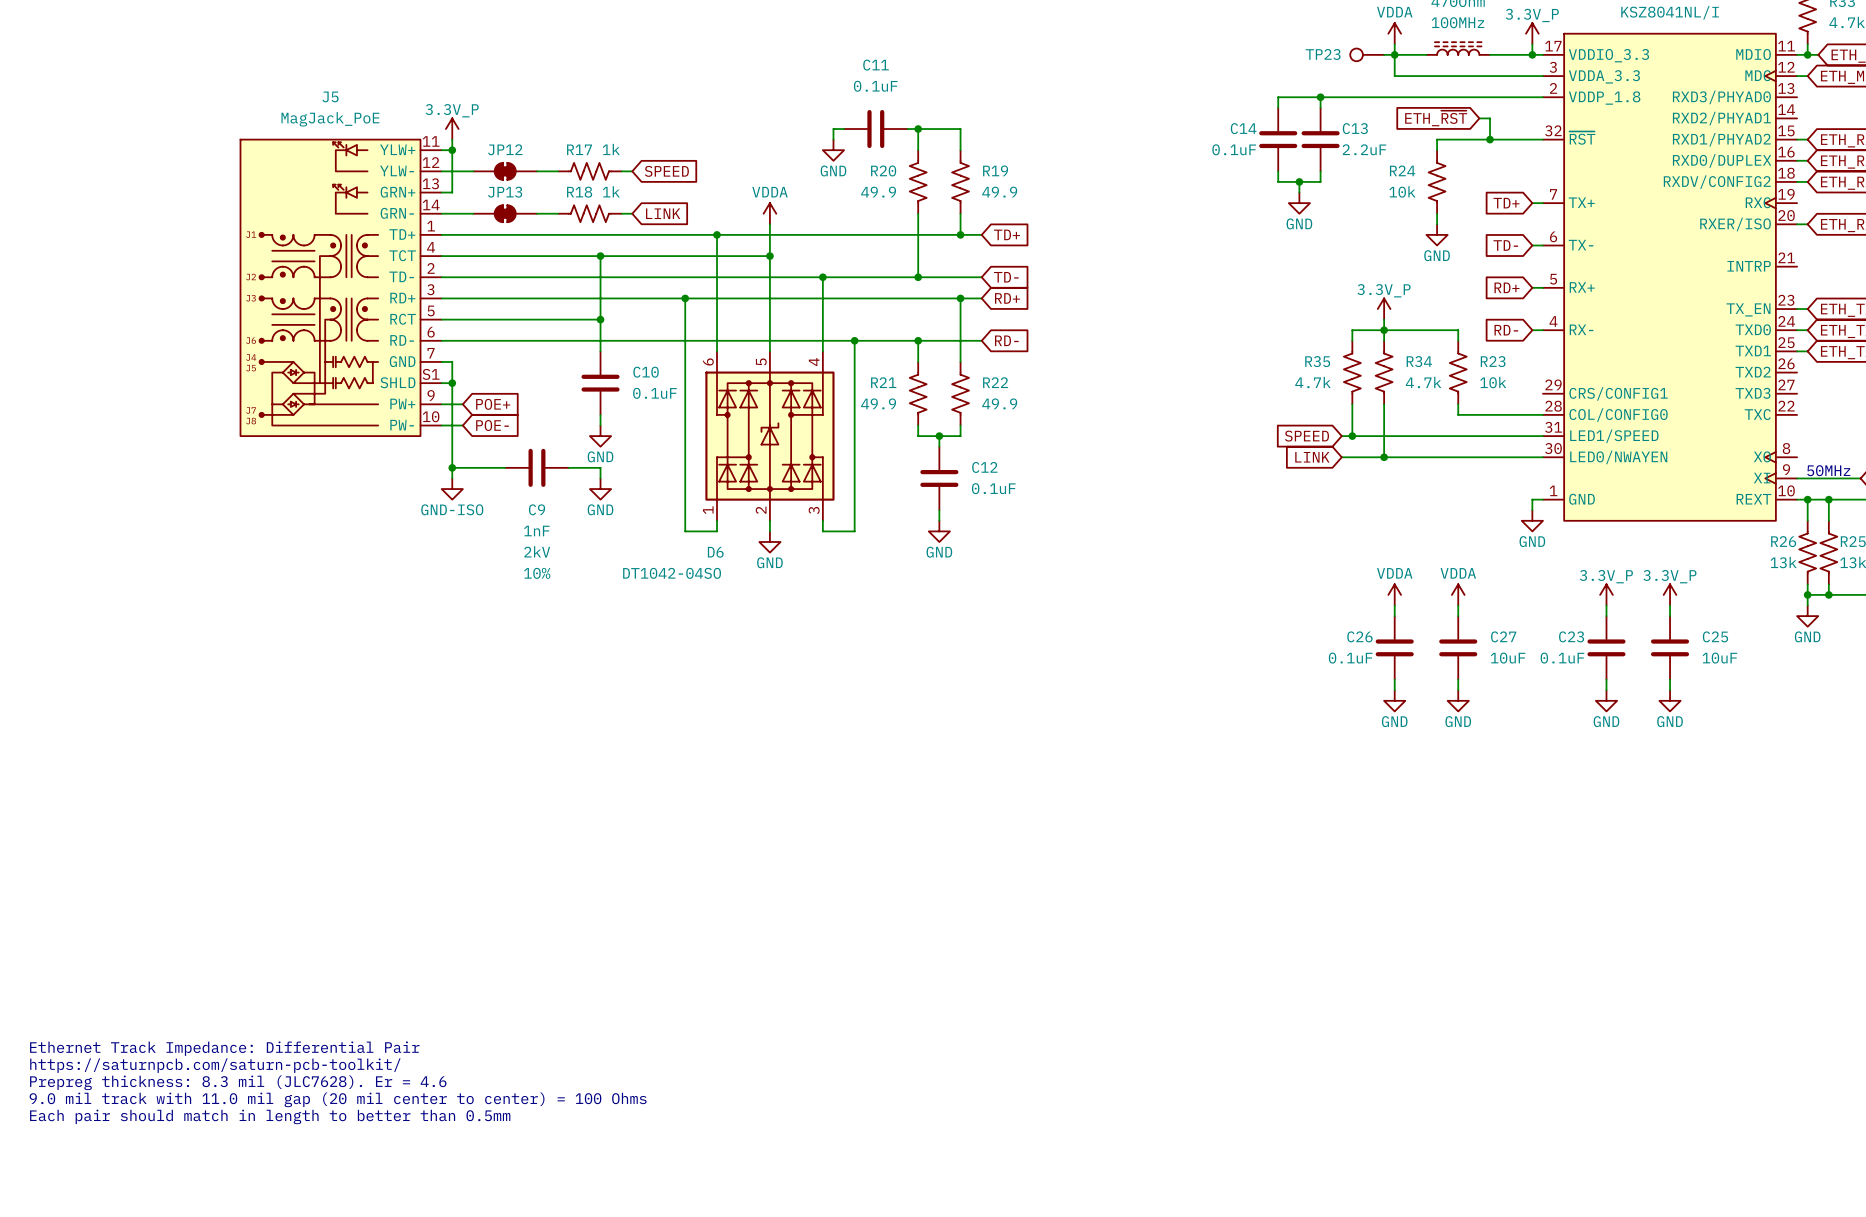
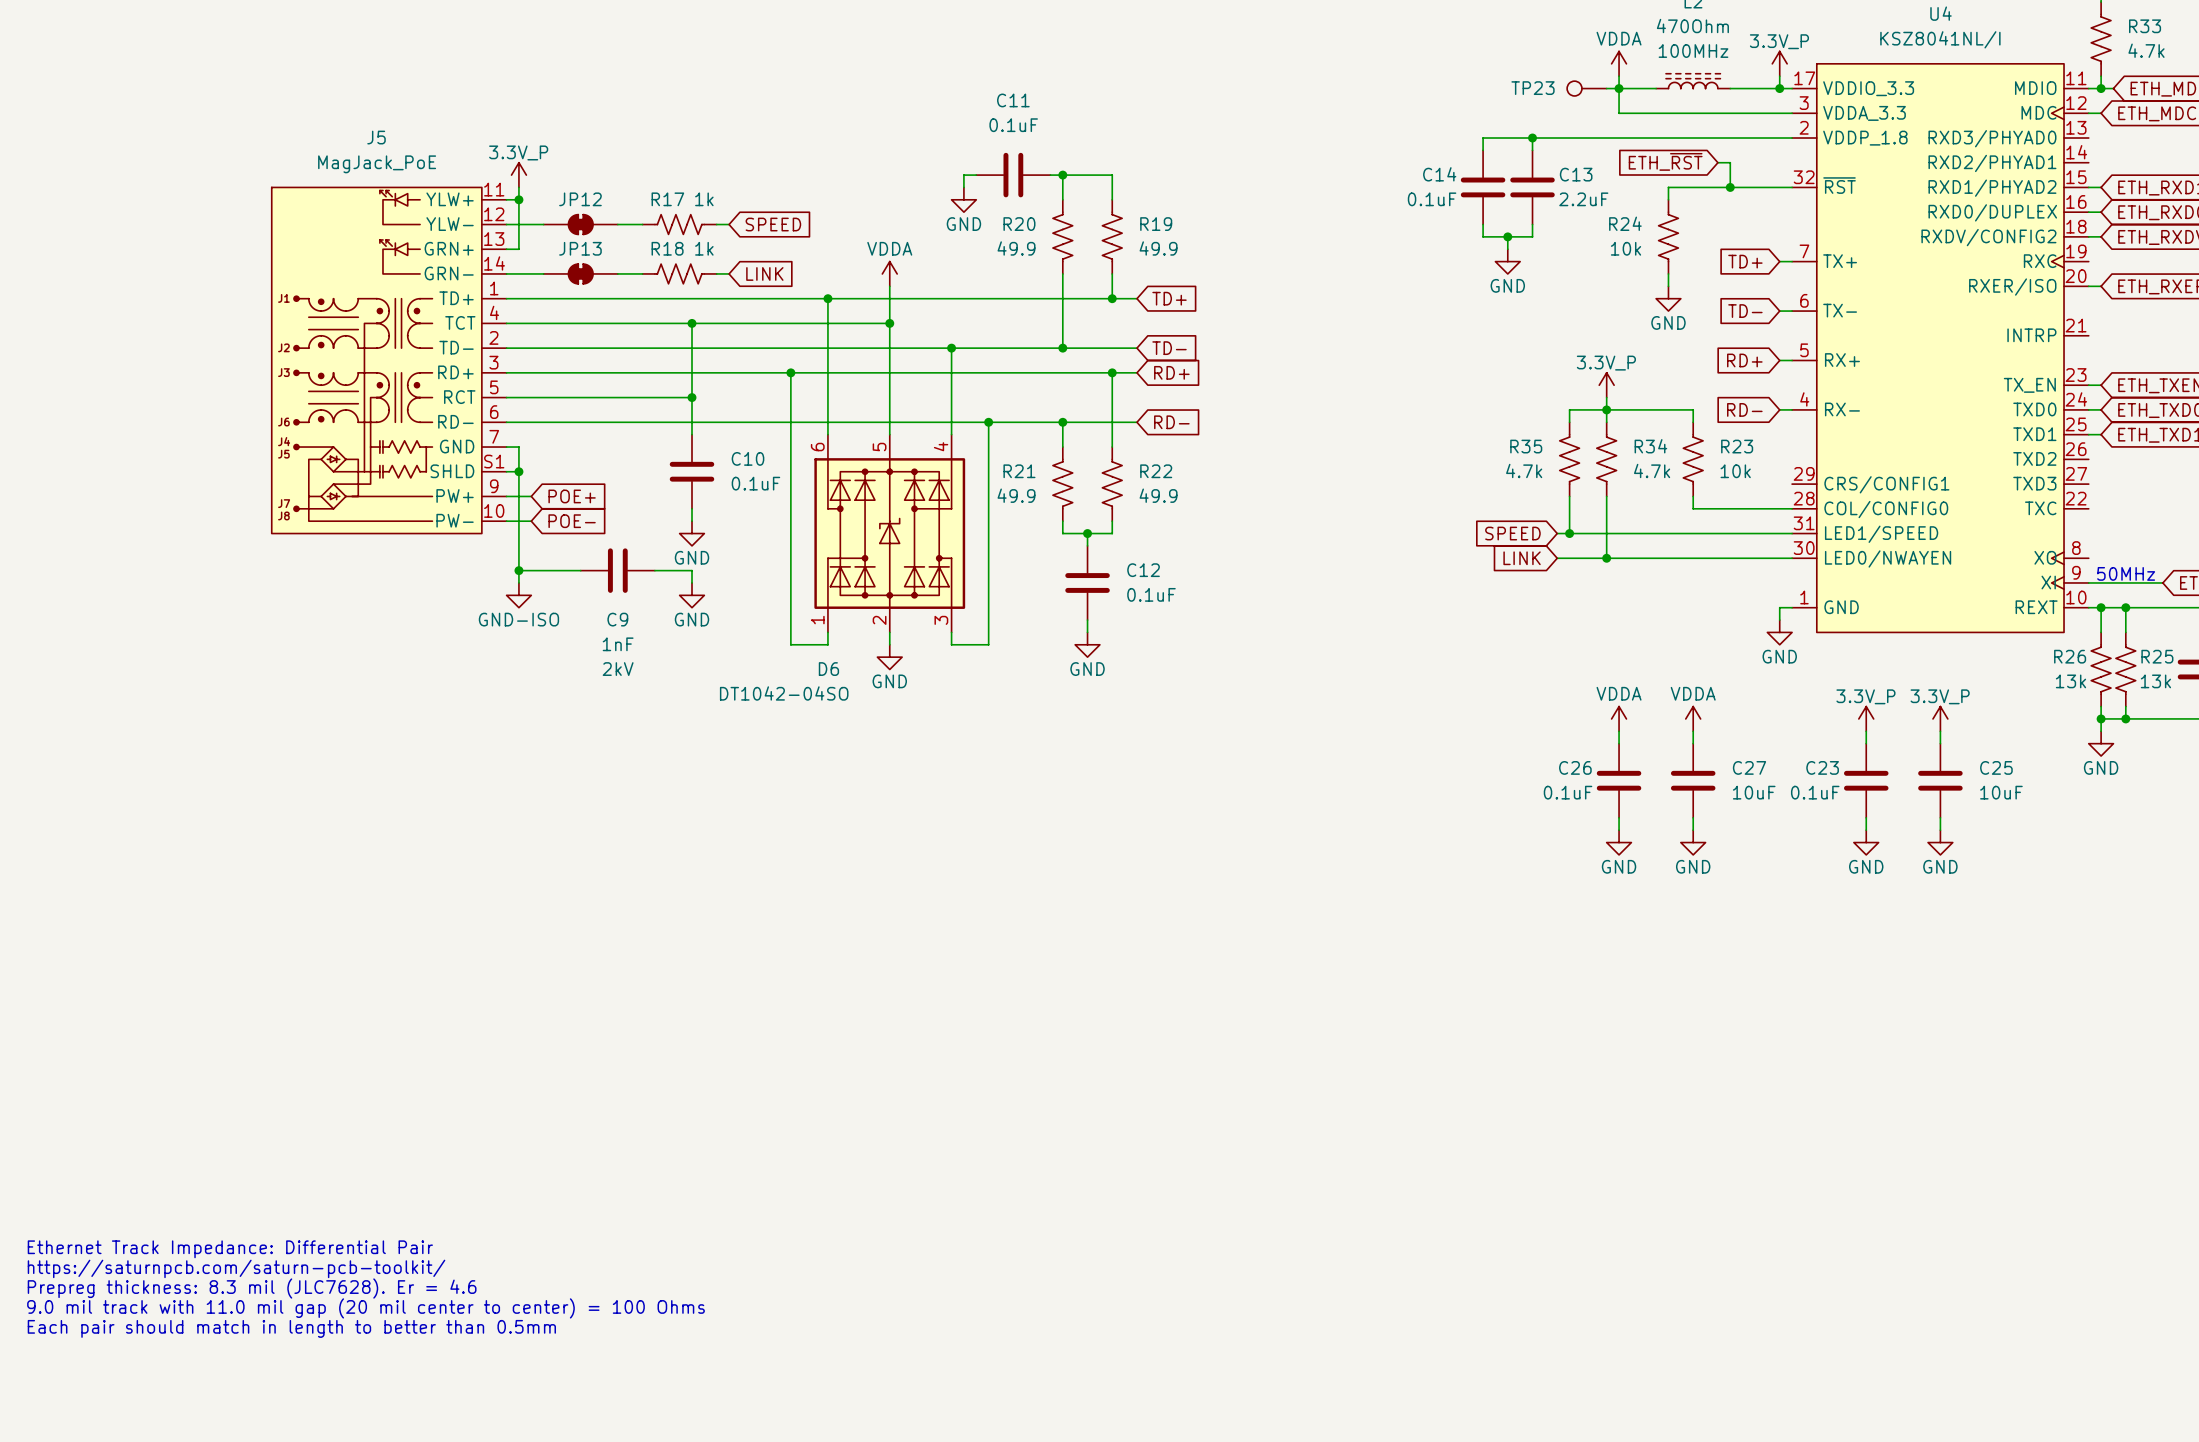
C9 text: 10% (537, 573) -> none

